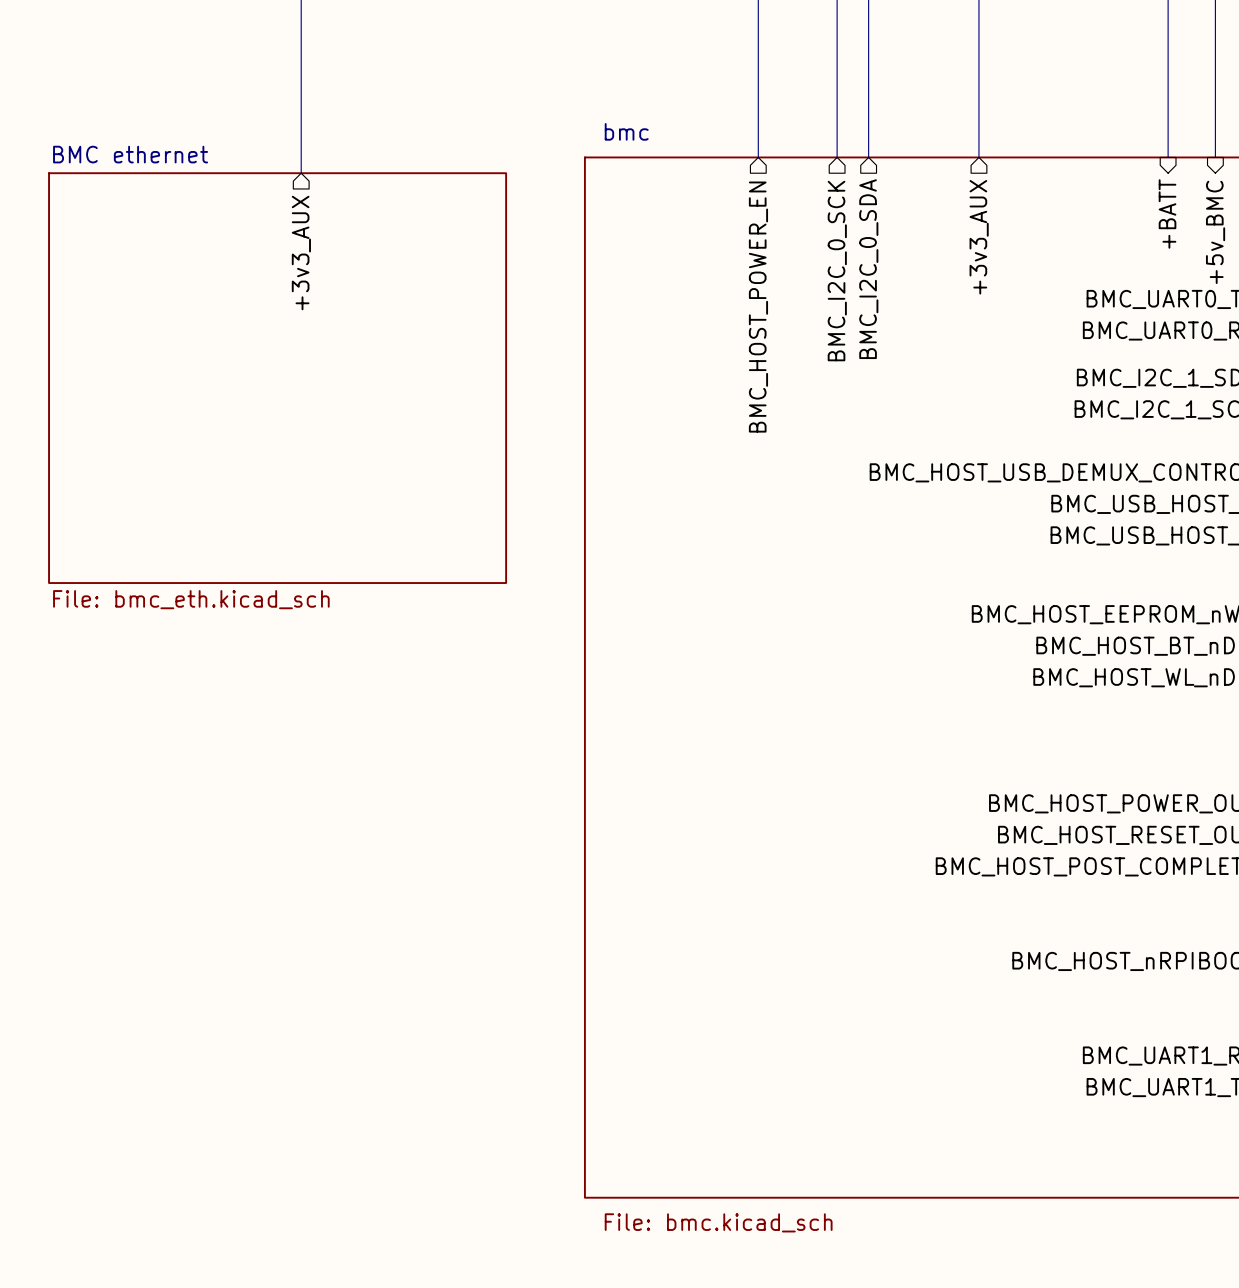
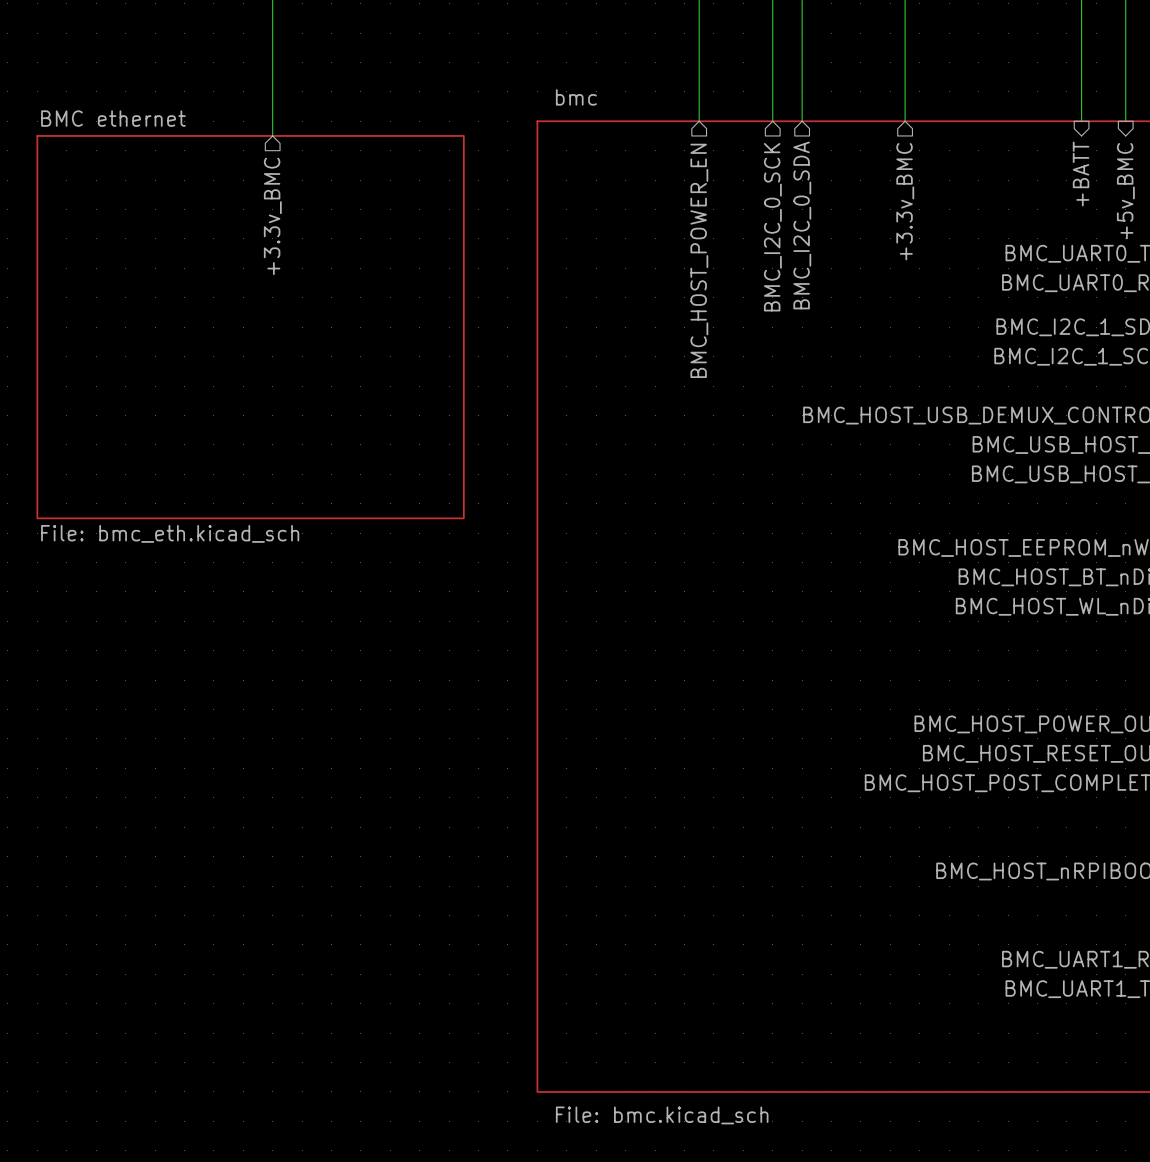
sheet pin: +3v3_AUX (979, 237) -> +3.3v_BMC (905, 201)
sheet pin: +3v3_AUX (301, 253) -> +3.3v_BMC (272, 216)

